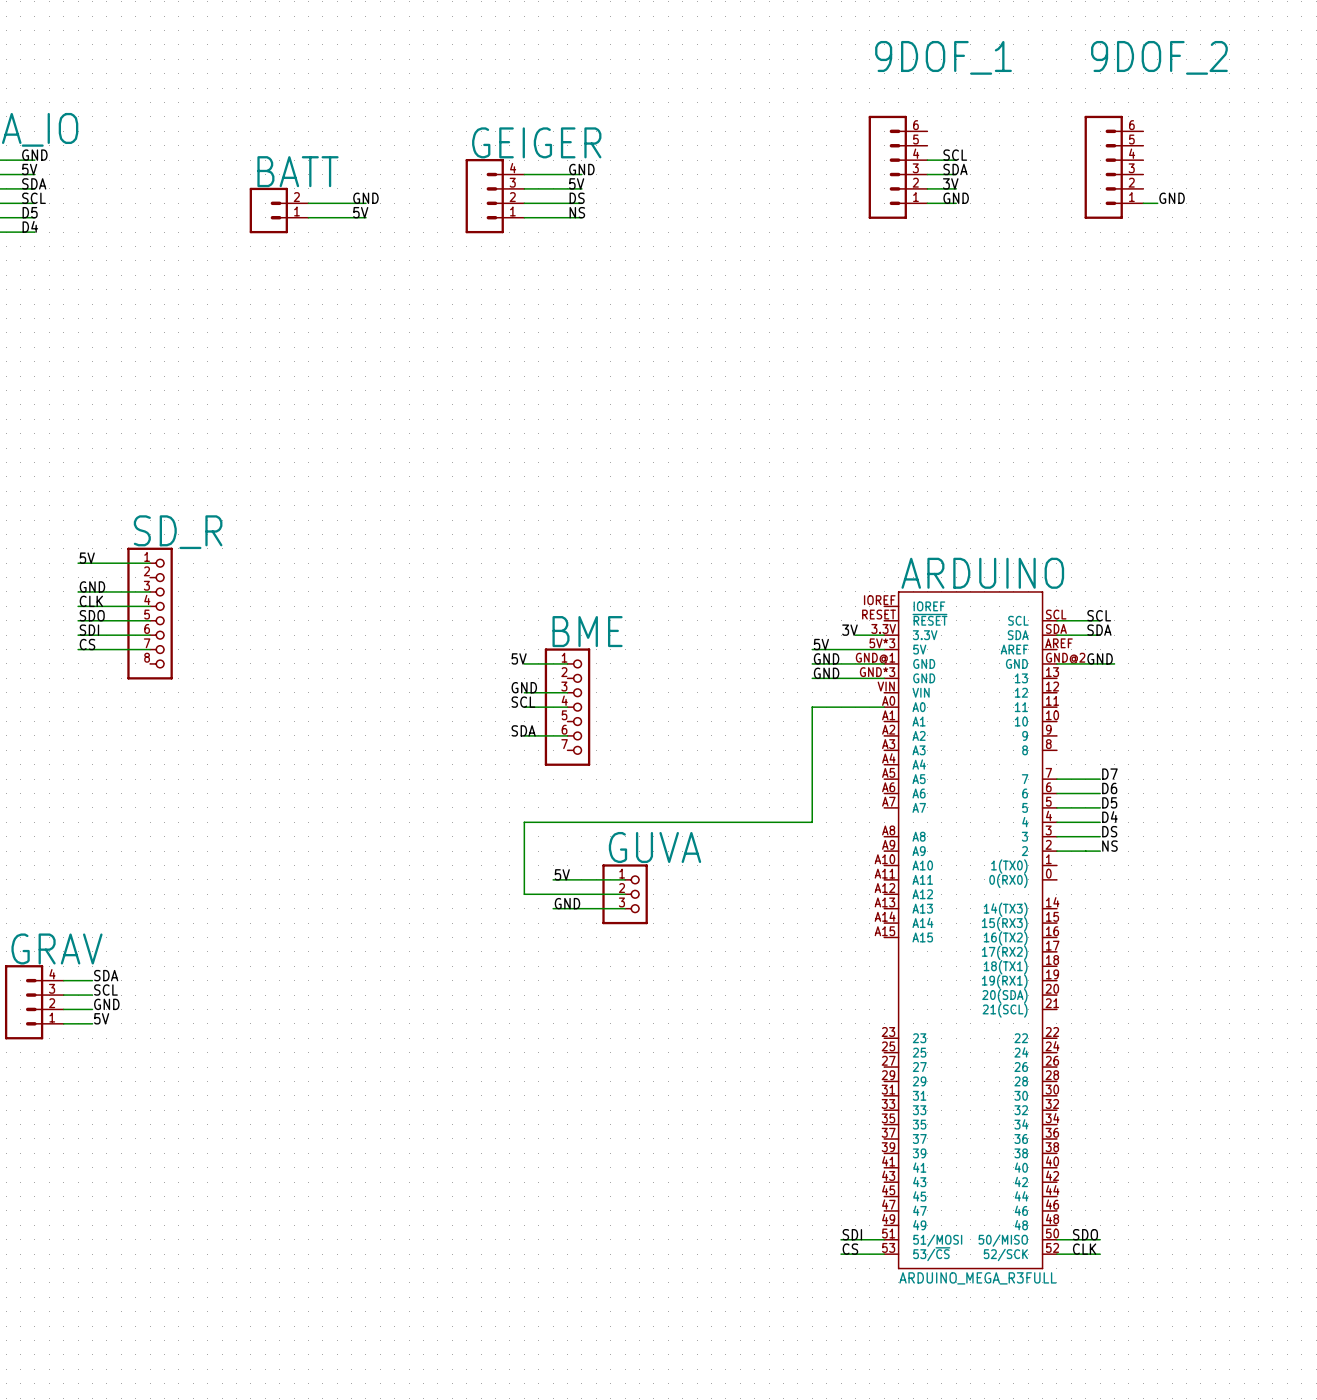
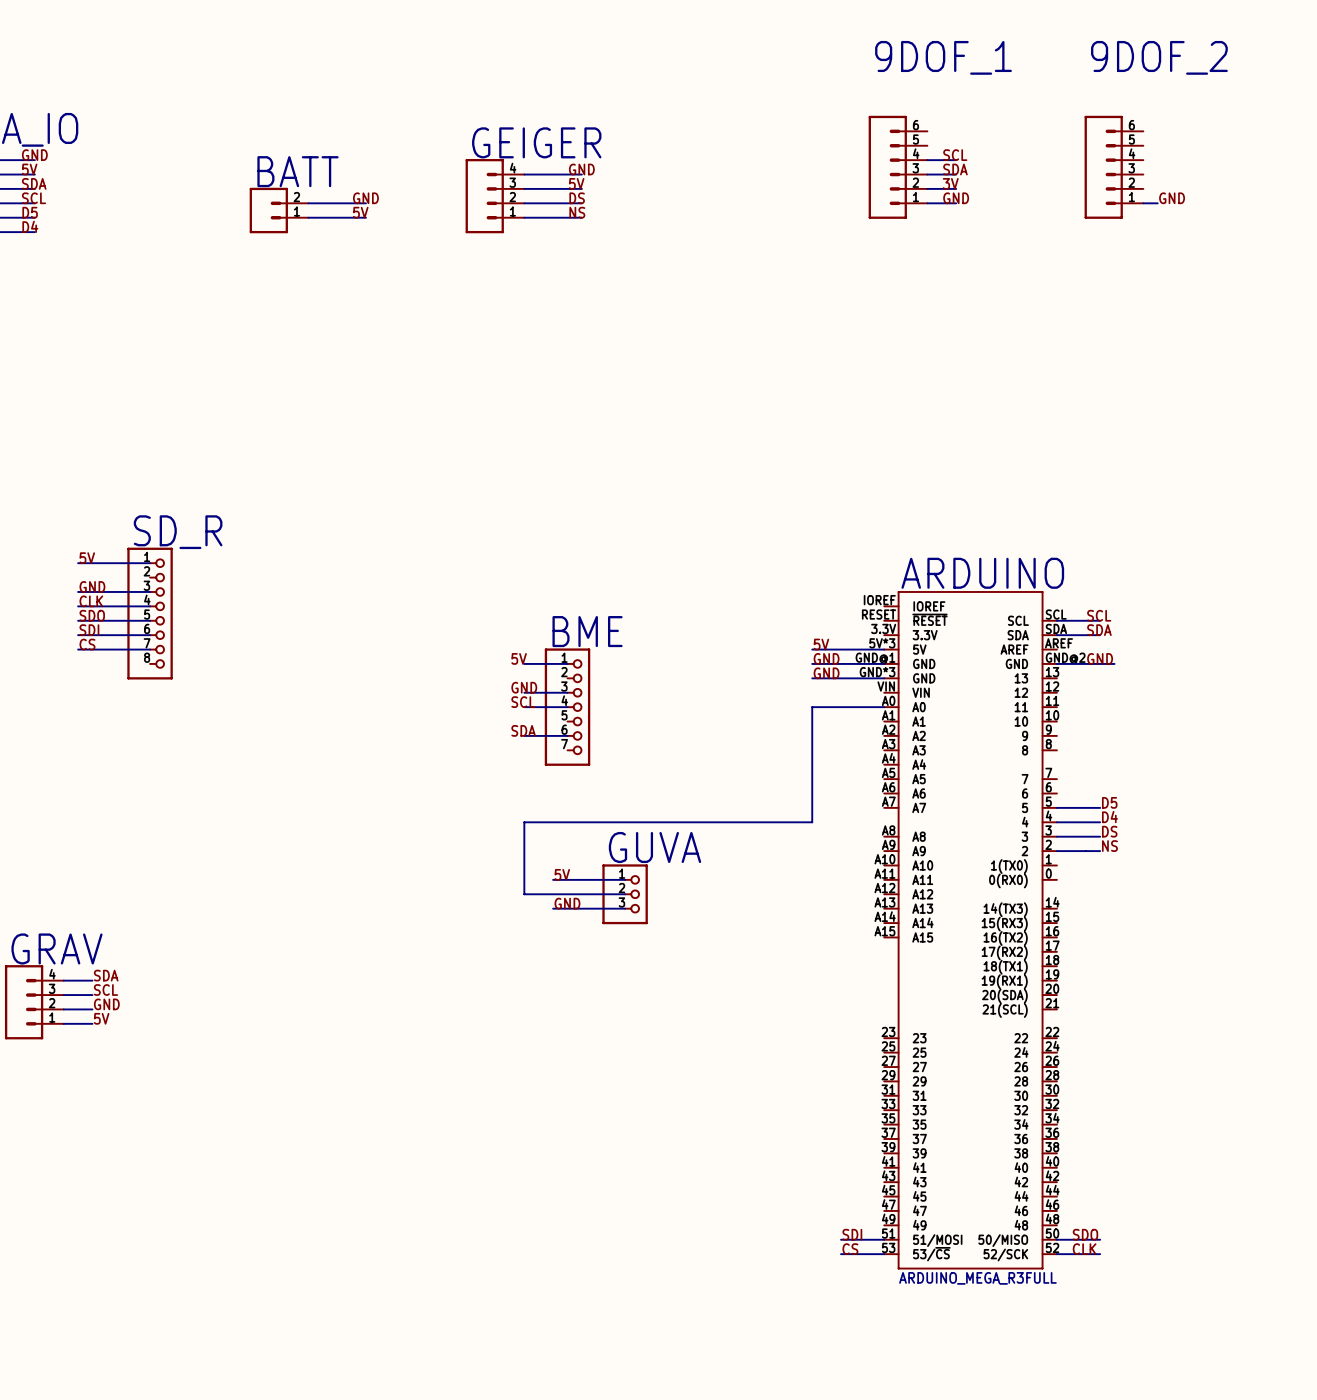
label: 3V (849, 630) -> none
wire: (855, 635) (884, 635) -> none
label: D7 (1109, 774) -> none
wire: (1056, 779) (1100, 779) -> none
label: D6 (1109, 788) -> none
wire: (1056, 793) (1100, 793) -> none

